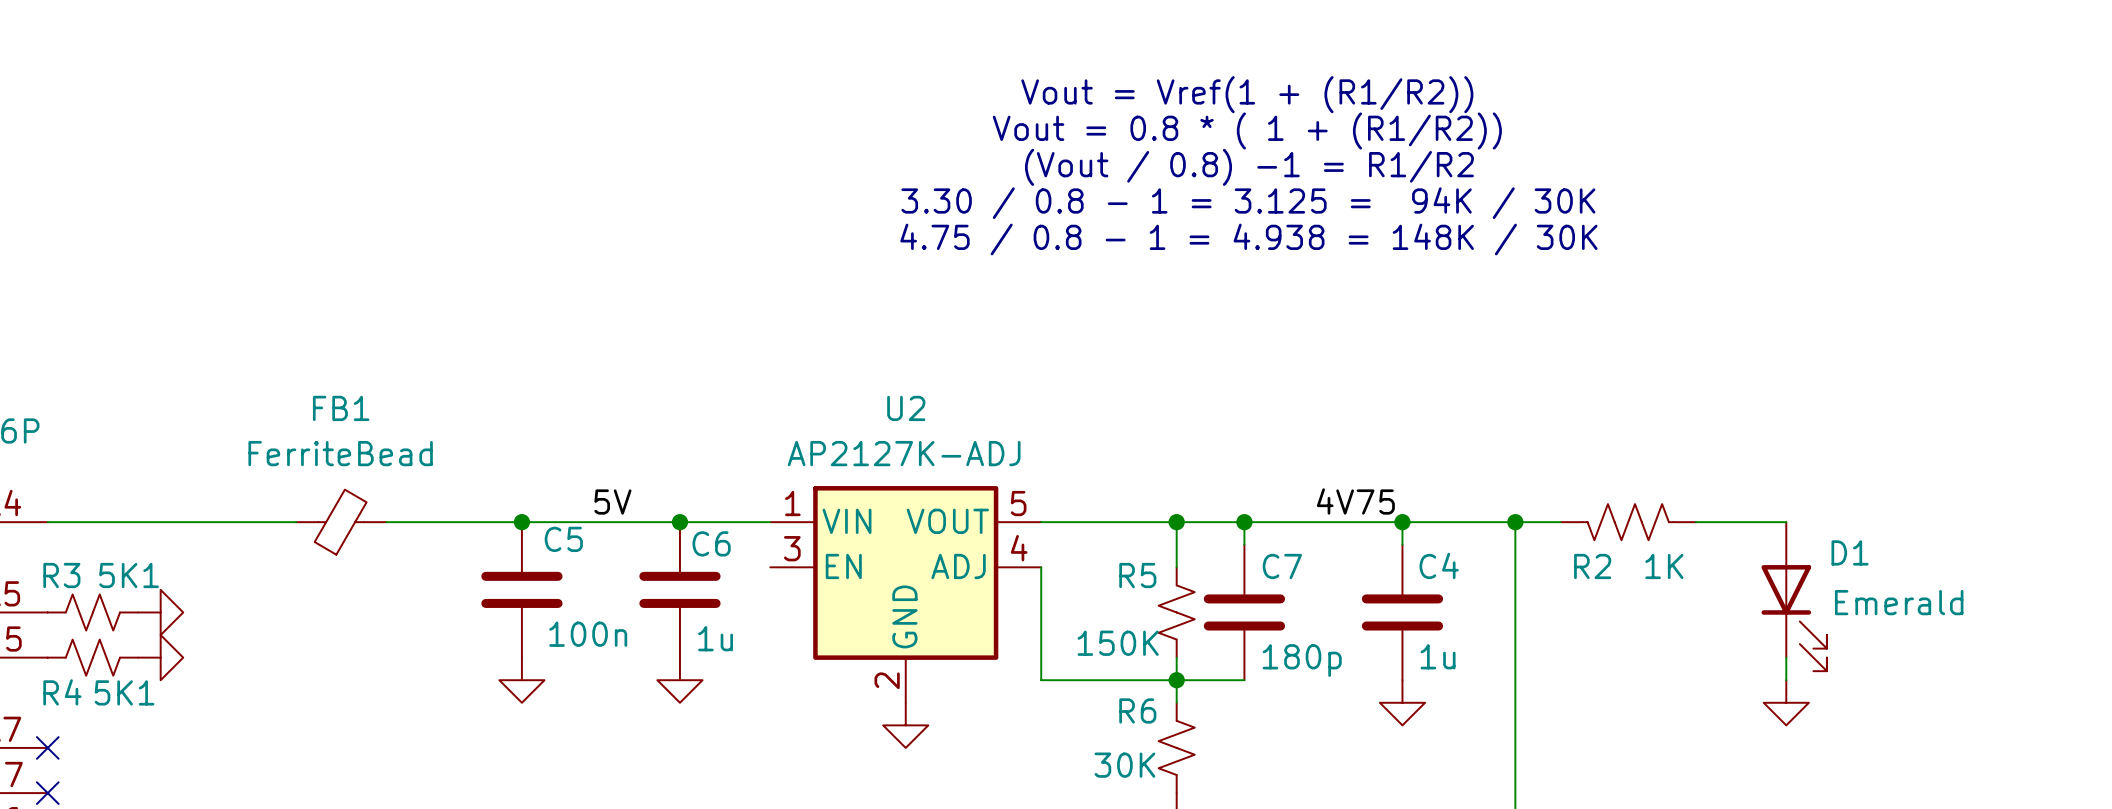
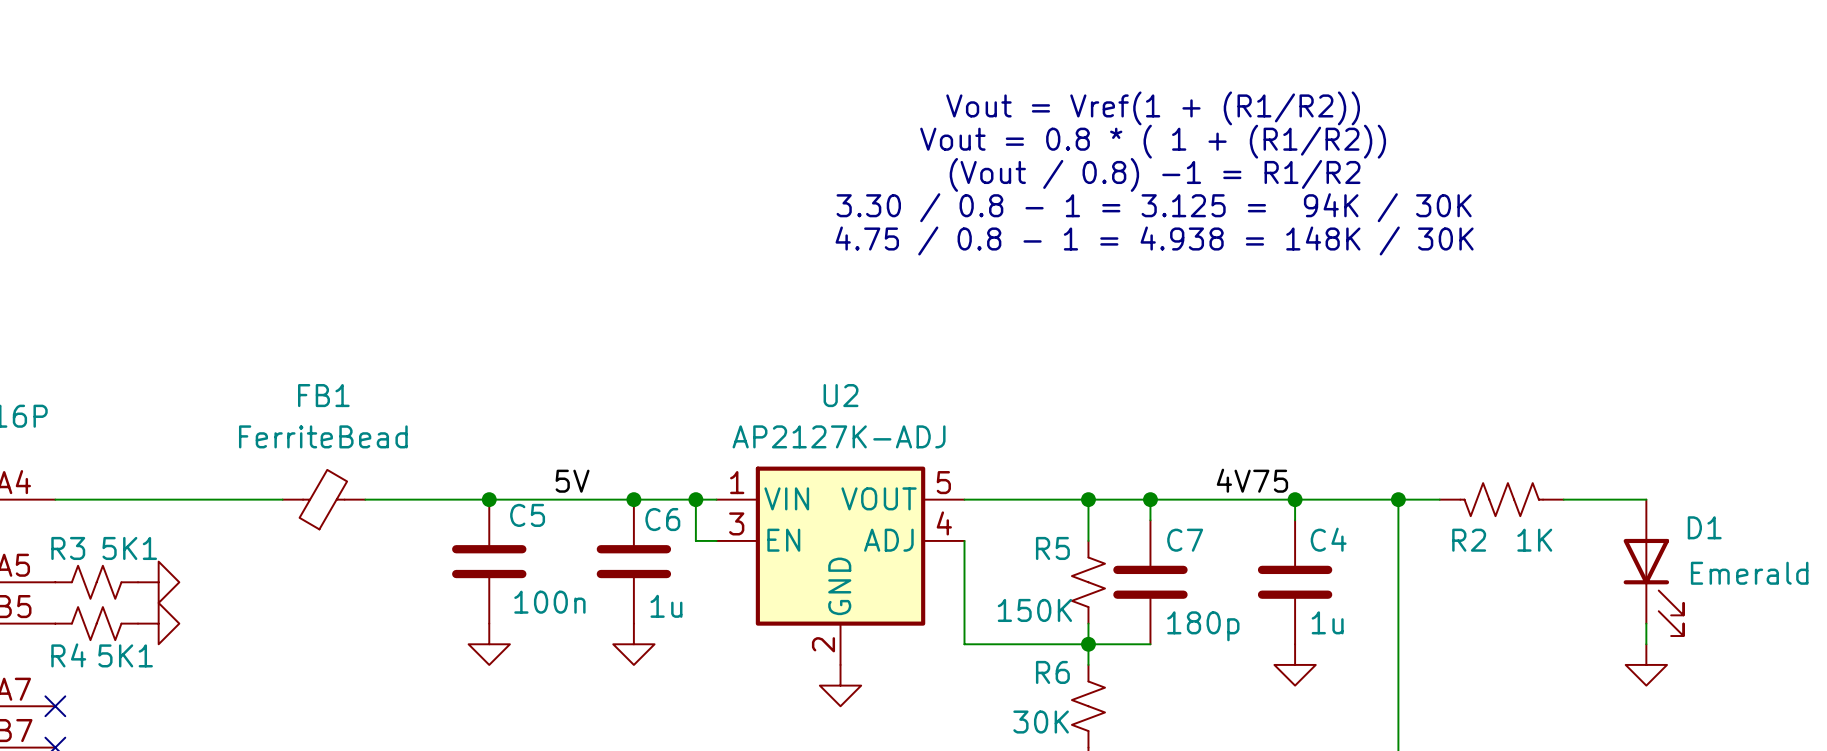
wire: none -> (695, 499) (695, 540) (716, 540)
junction: none -> (695, 499)

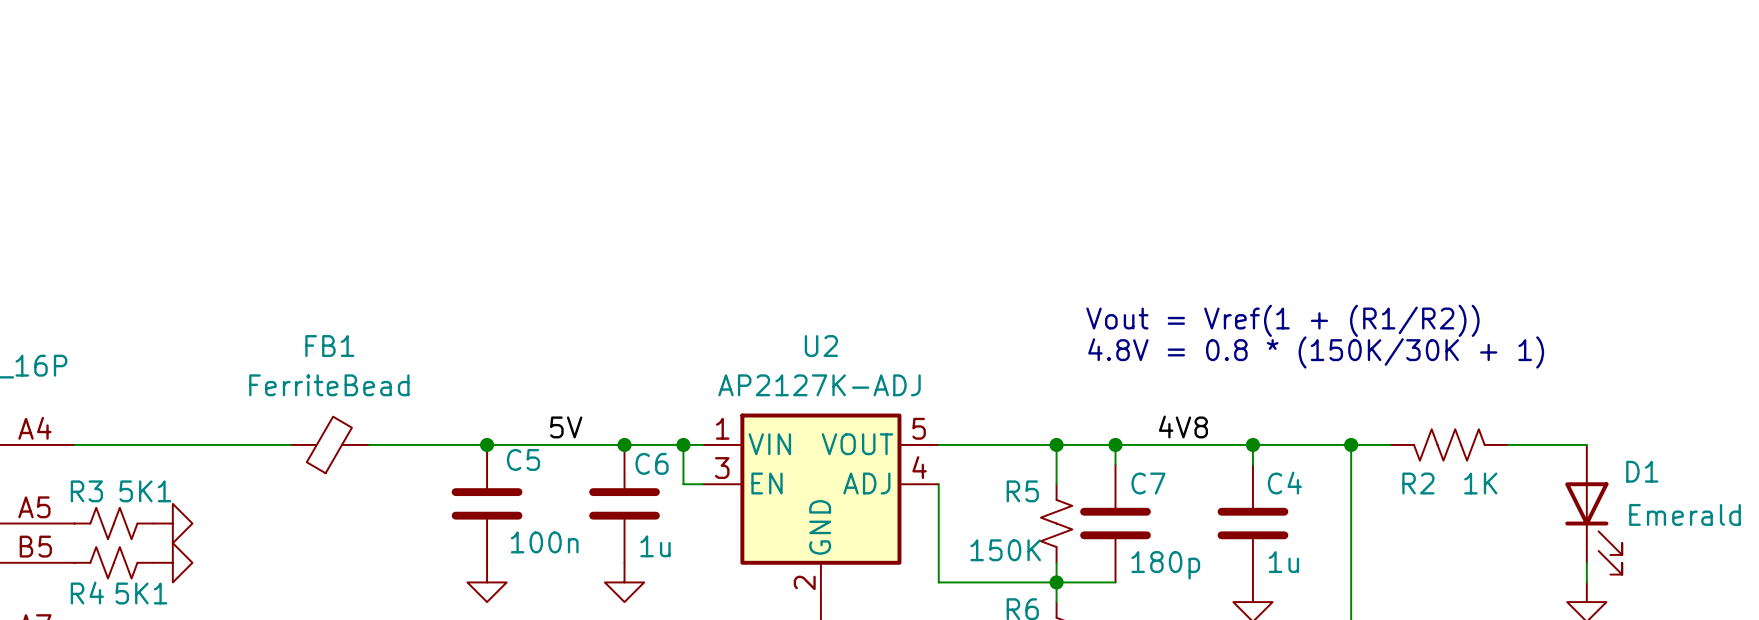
text position: Vout = Vref(1 + (R1/R2)) (1153, 108) -> Vout = Vref(1 + (R1/R2)) (1282, 320)
text: Vout = 0.8 * ( 1 + (R1/R2)) (1153, 141) -> none
text: (Vout / 0.8) -1 = R1/R2 (1155, 174) -> none
text: 3.30 / 0.8 - 1 = 3.125 = 94K / 30K (1154, 207) -> none
text: 4.75 / 0.8 - 1 = 4.938 = 148K / 30K (1154, 240) -> none
text: none -> 4.8V = 0.8 * (150K/30K + 1) (1316, 352)
label: none -> 4V8 (1183, 426)
label: 4V75 (1252, 480) -> none

